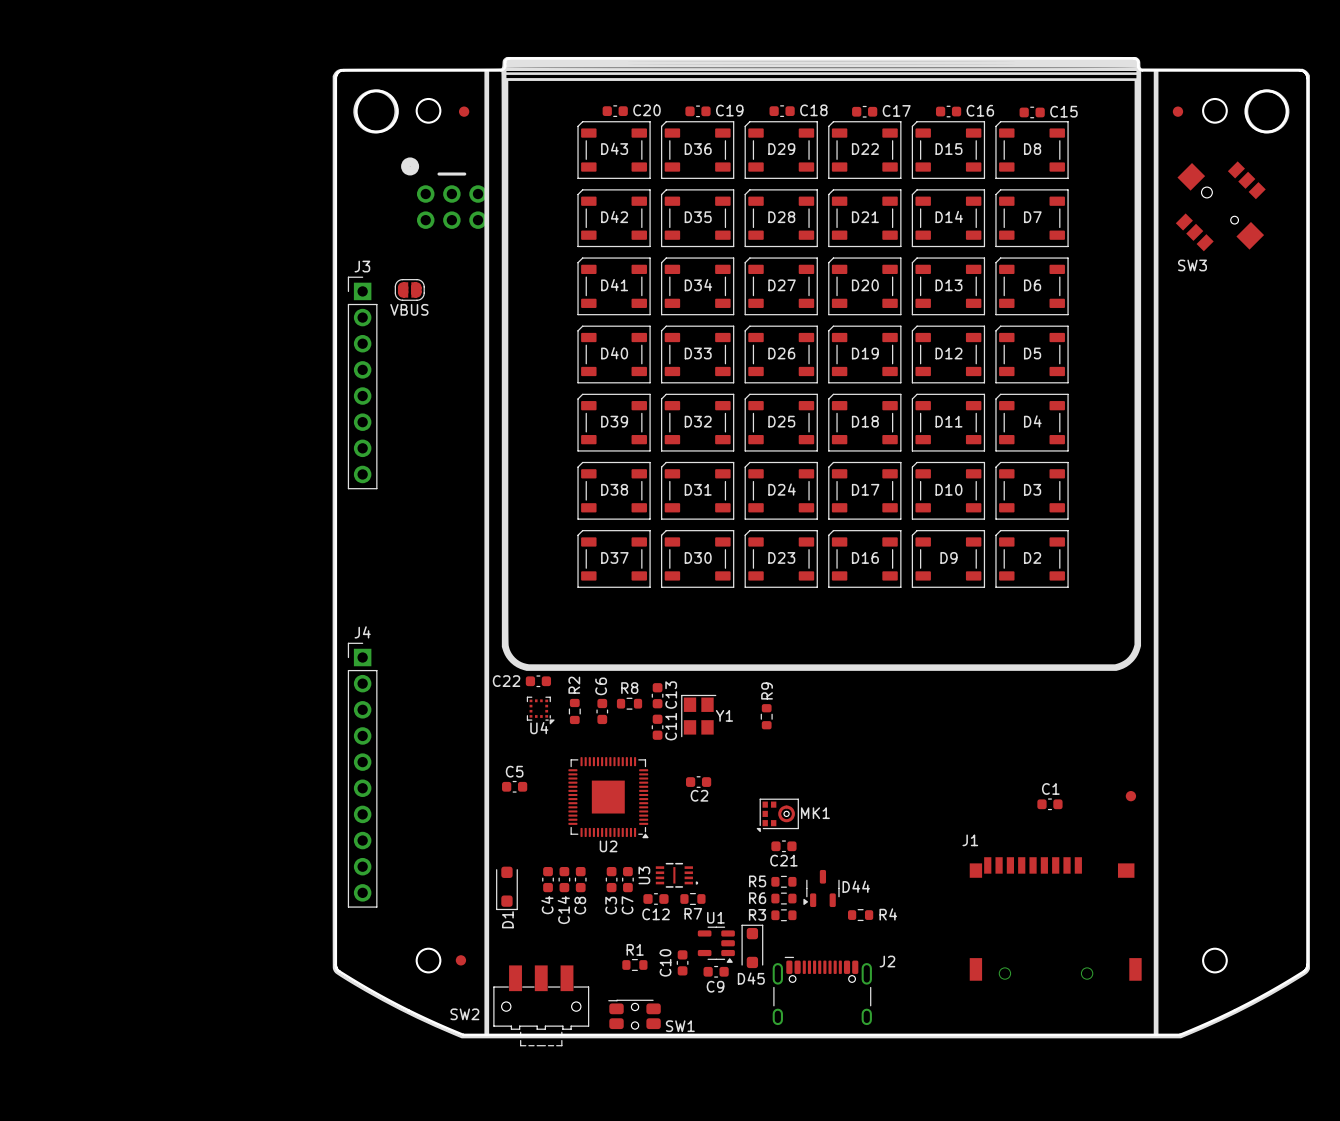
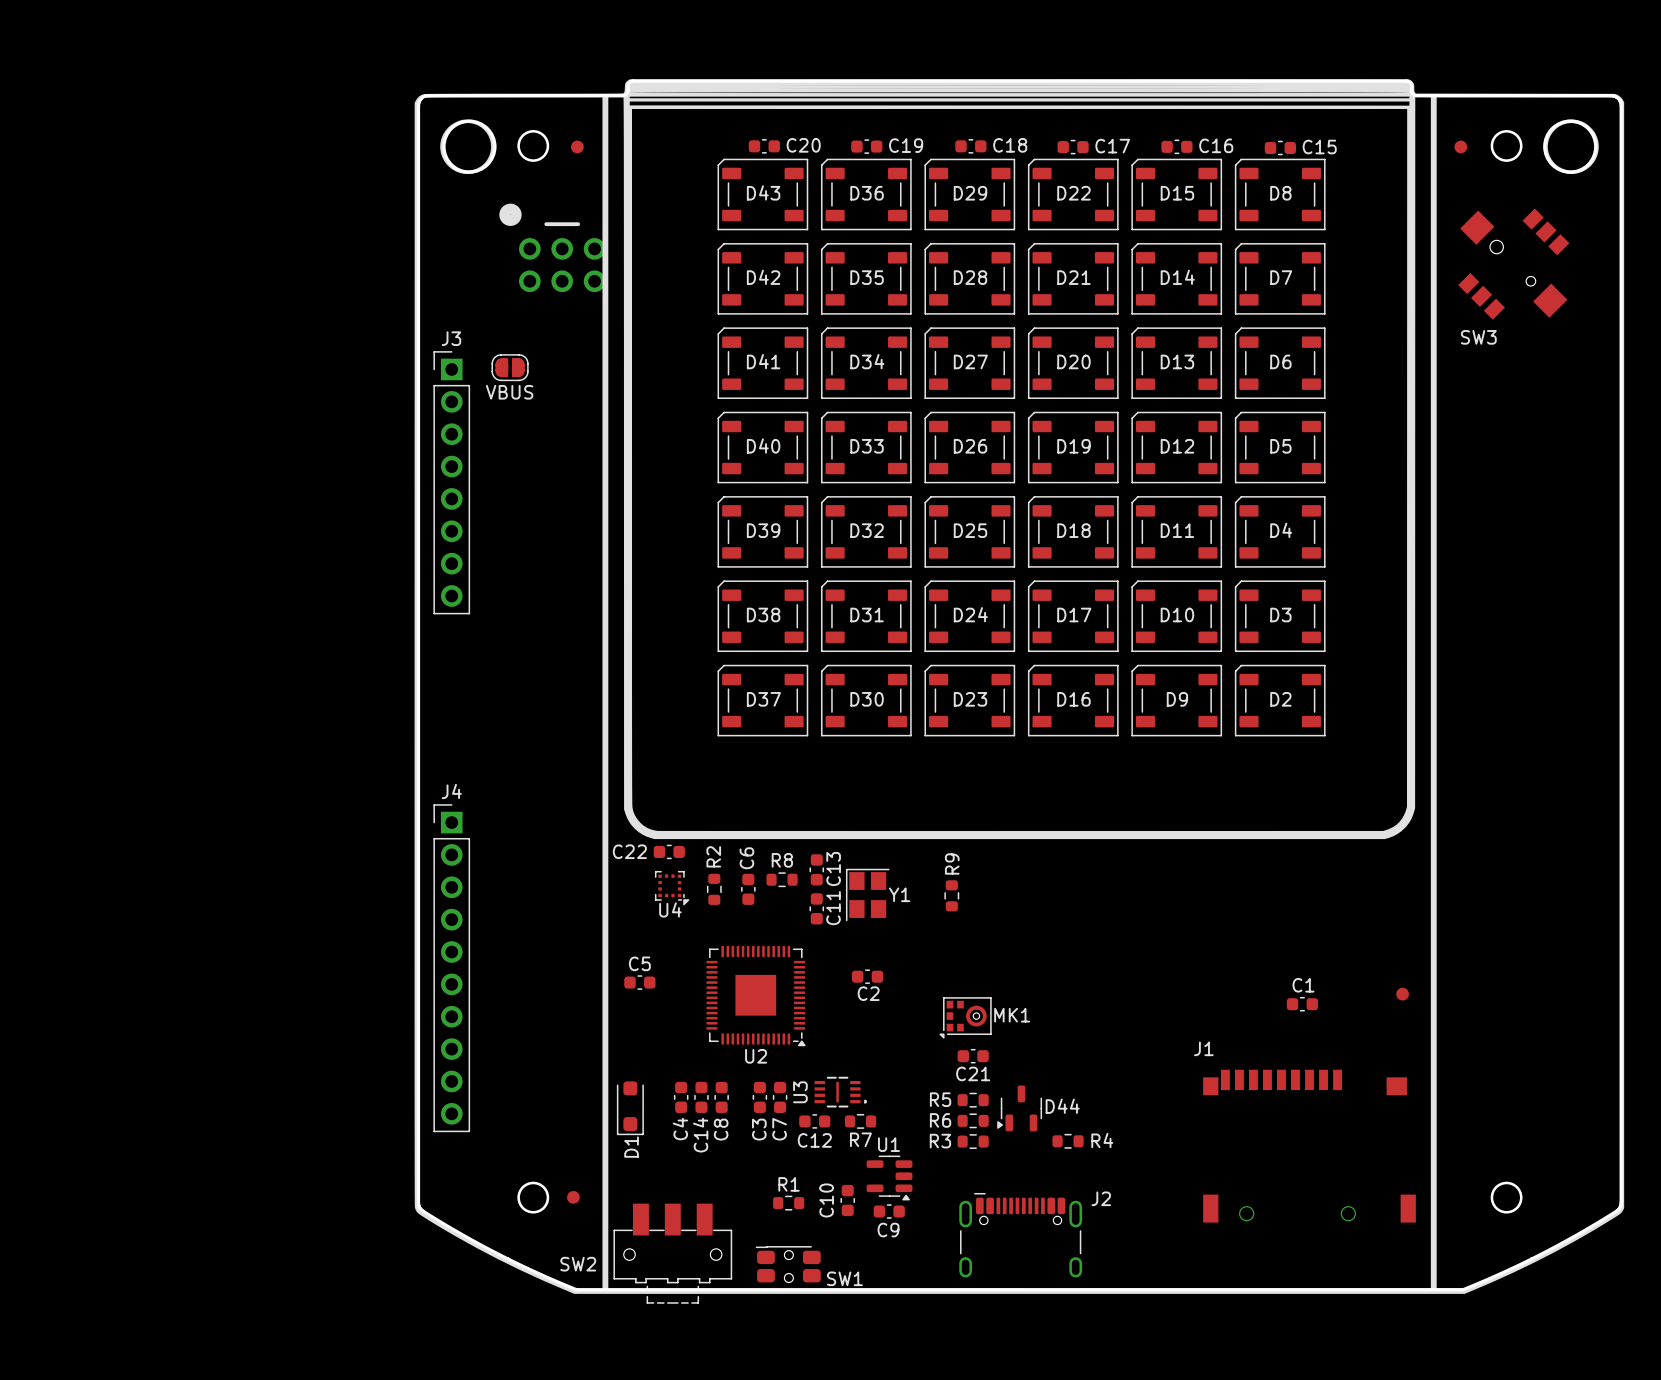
D45: (752, 946) -> none

